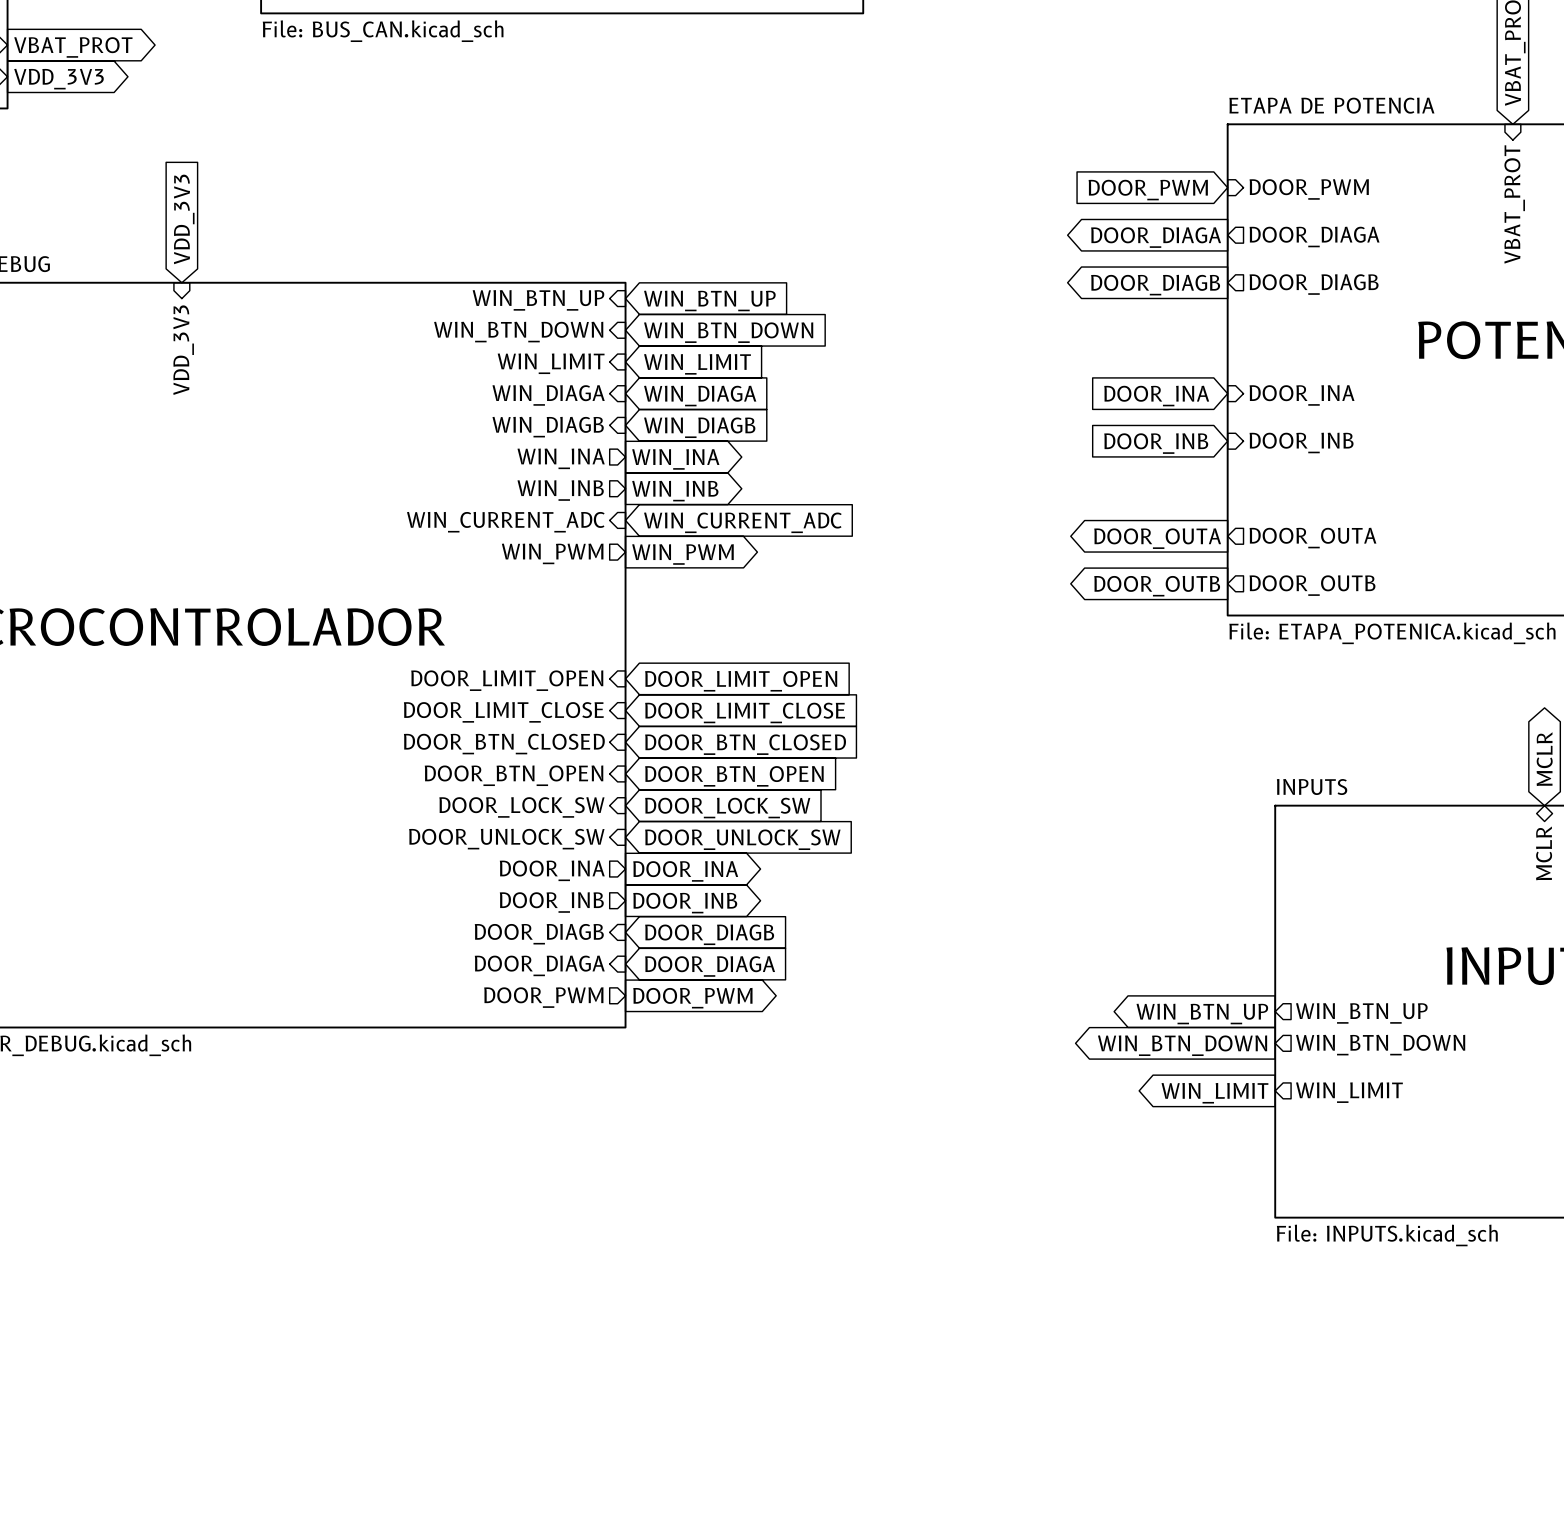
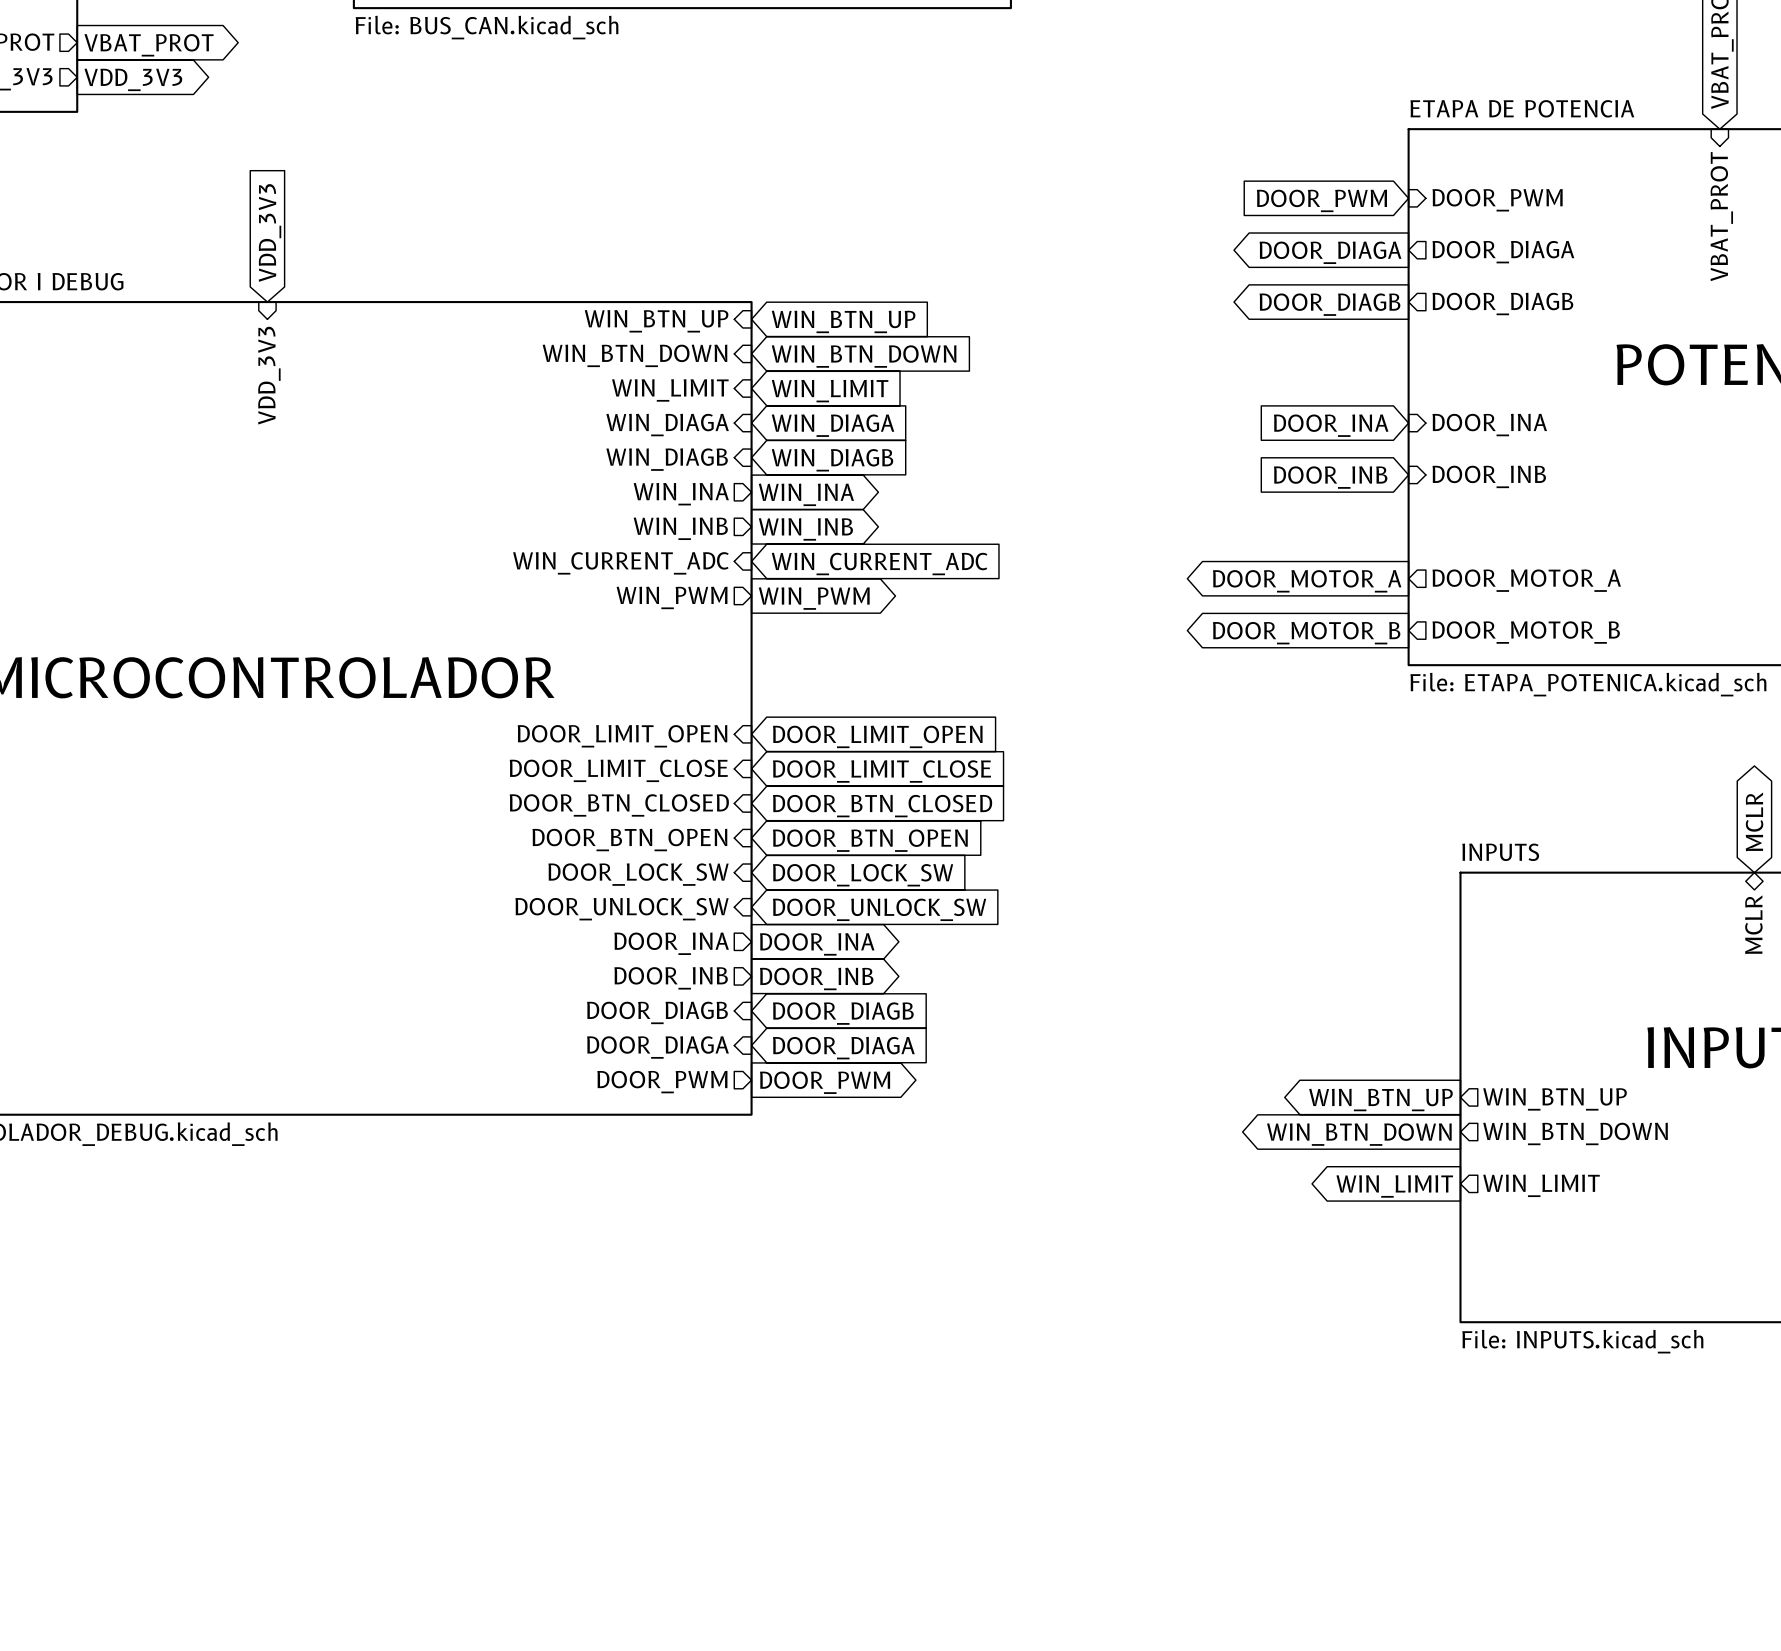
global label: DOOR_OUTA (1157, 538) -> DOOR_MOTOR_A (1307, 581)
sheet pin: DOOR_OUTA (1312, 538) -> DOOR_MOTOR_A (1526, 580)
sheet pin: DOOR_OUTB (1312, 585) -> DOOR_MOTOR_B (1526, 632)
global label: DOOR_OUTB (1157, 586) -> DOOR_MOTOR_B (1306, 633)

